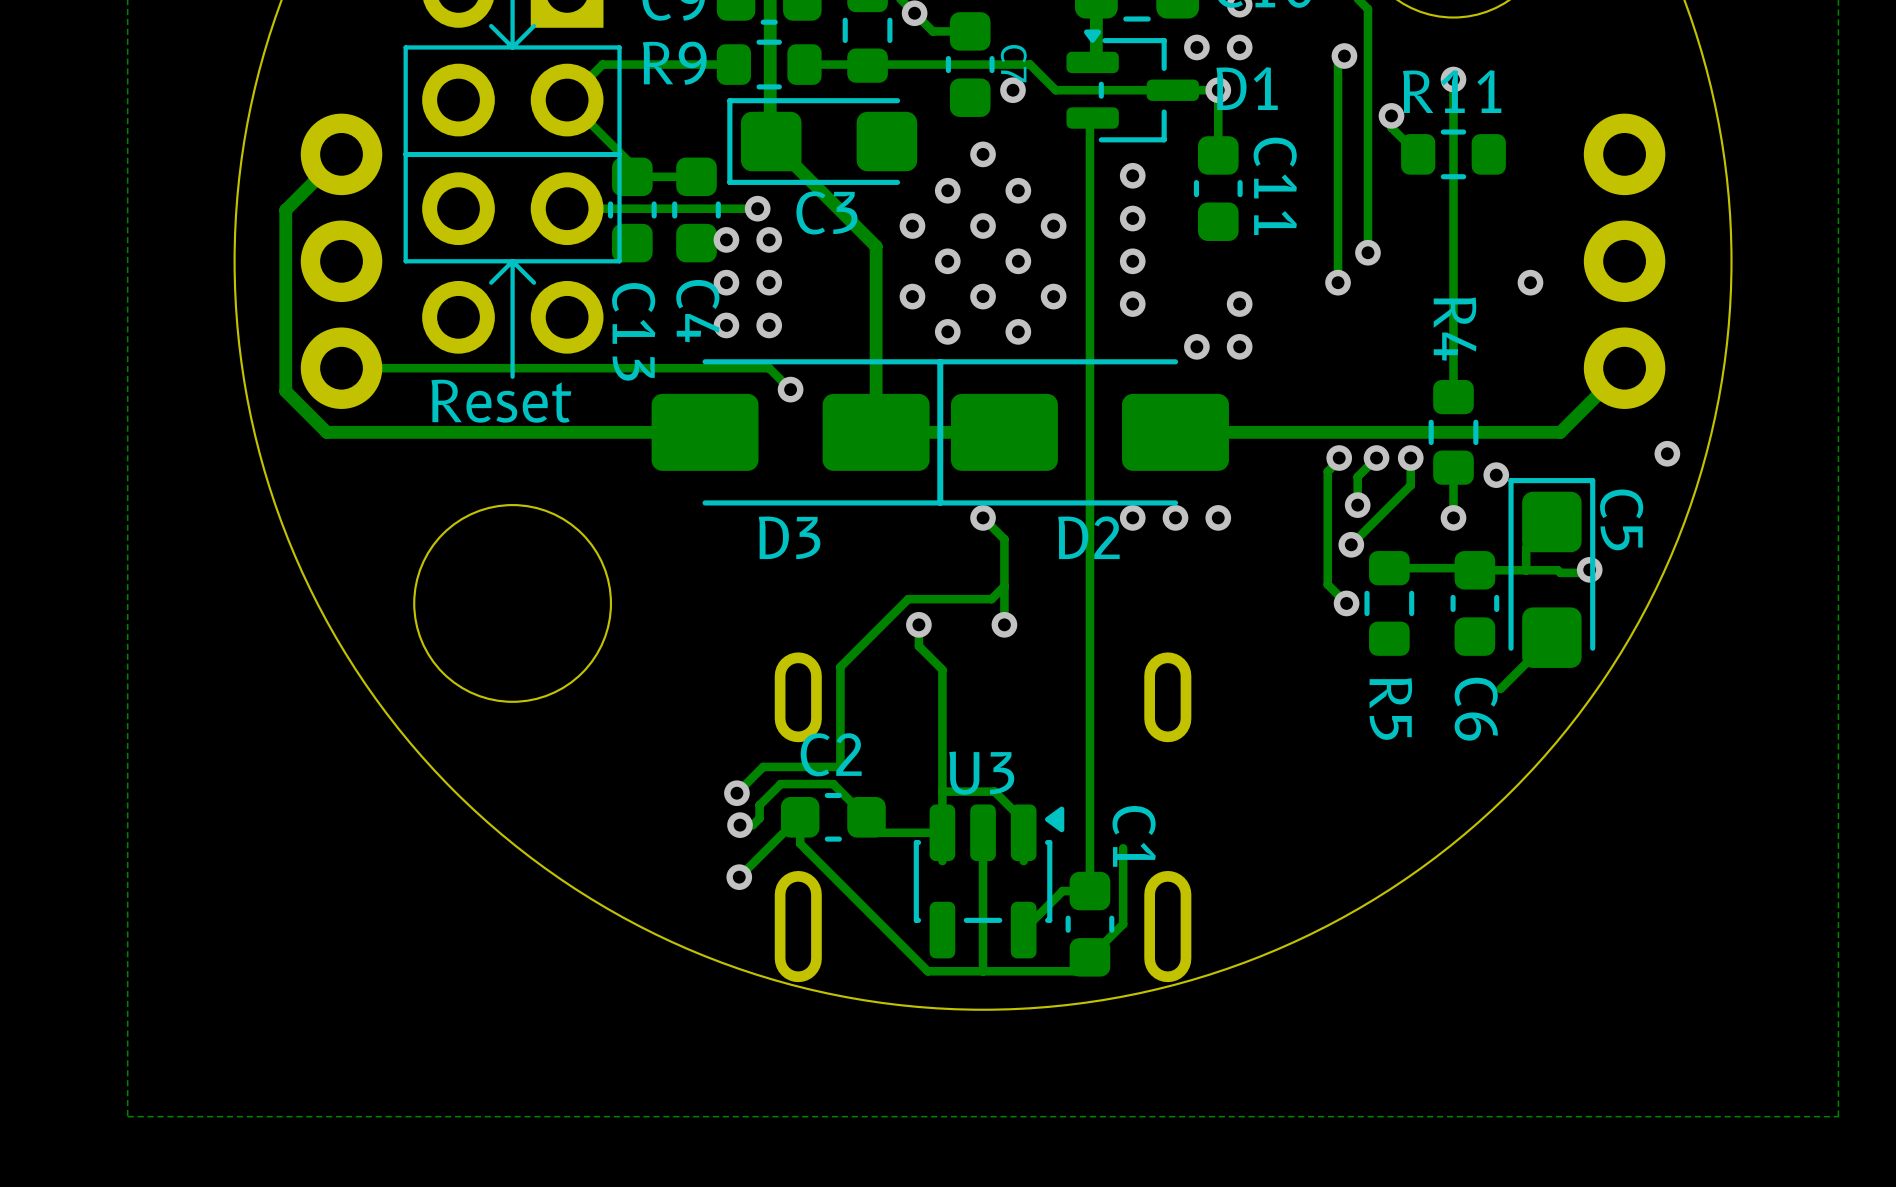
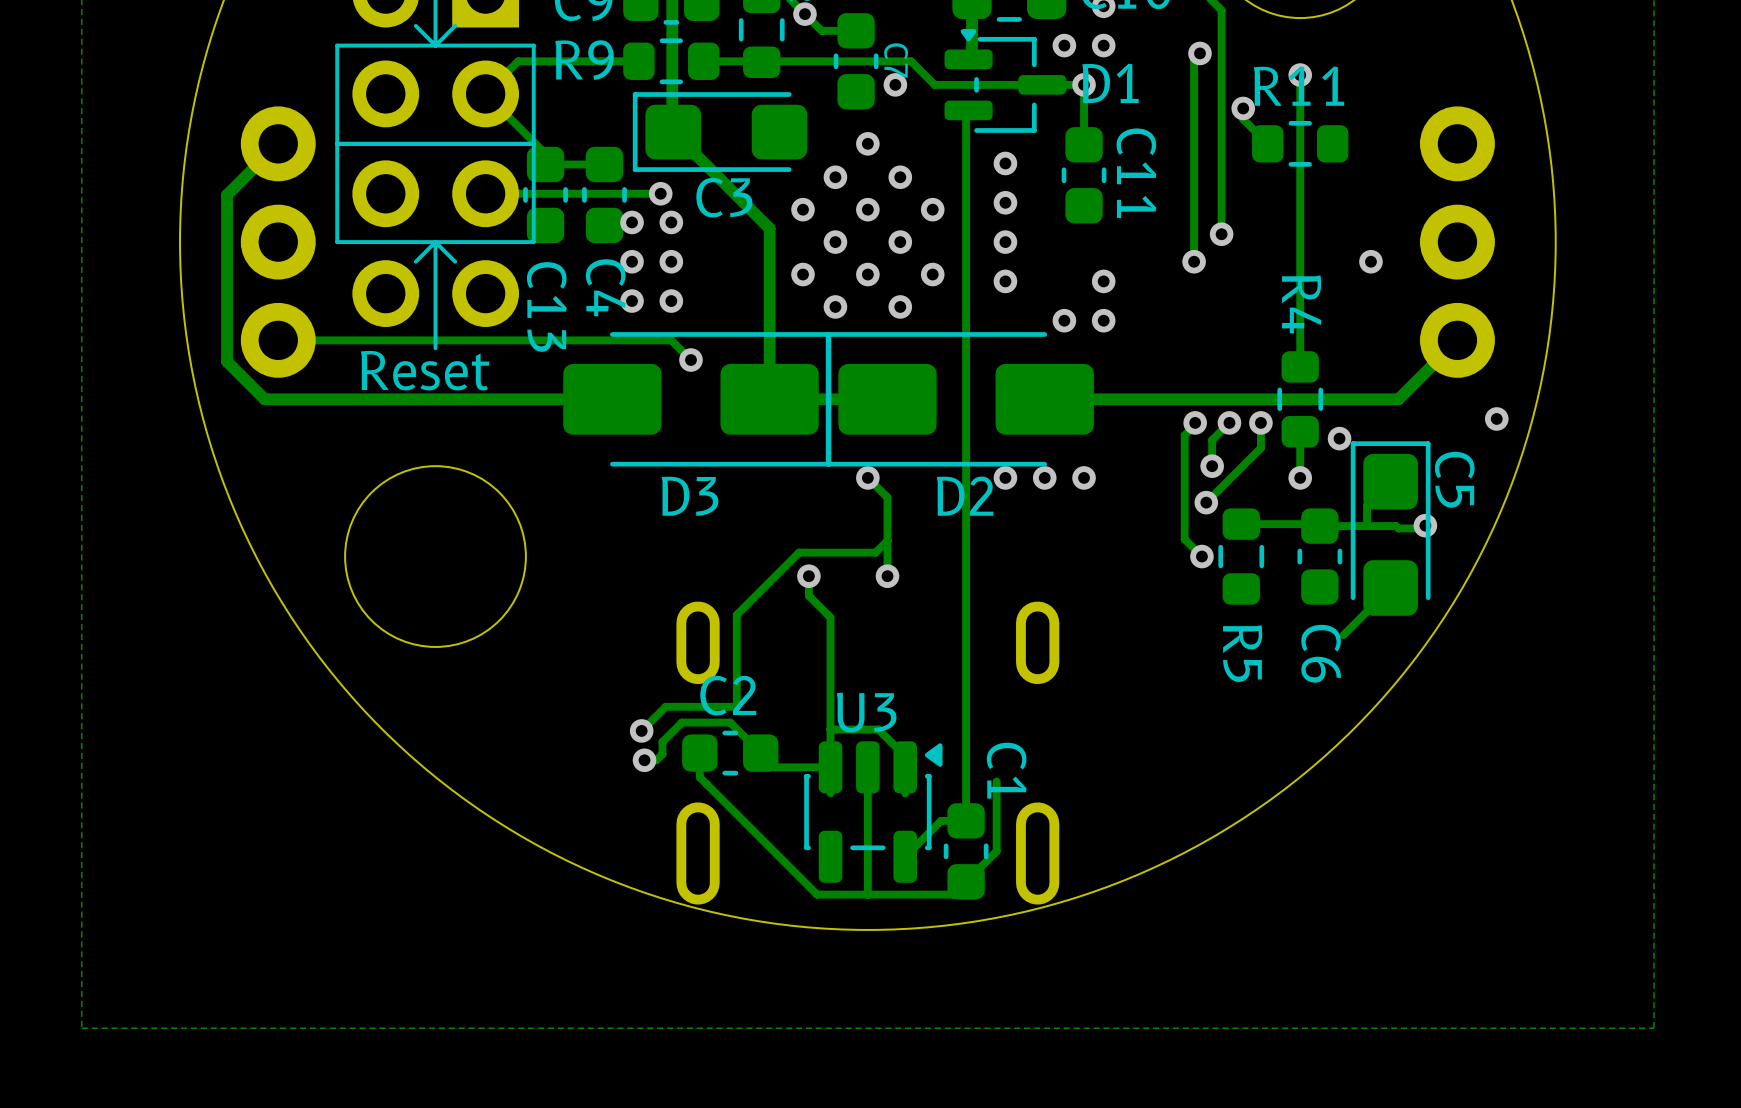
track: (800, 817) (739, 877) -> none
via: (739, 877) -> none

